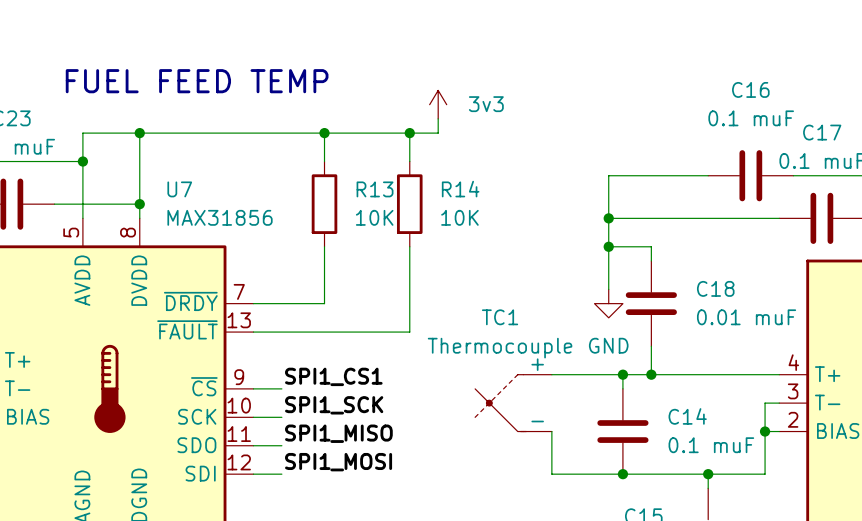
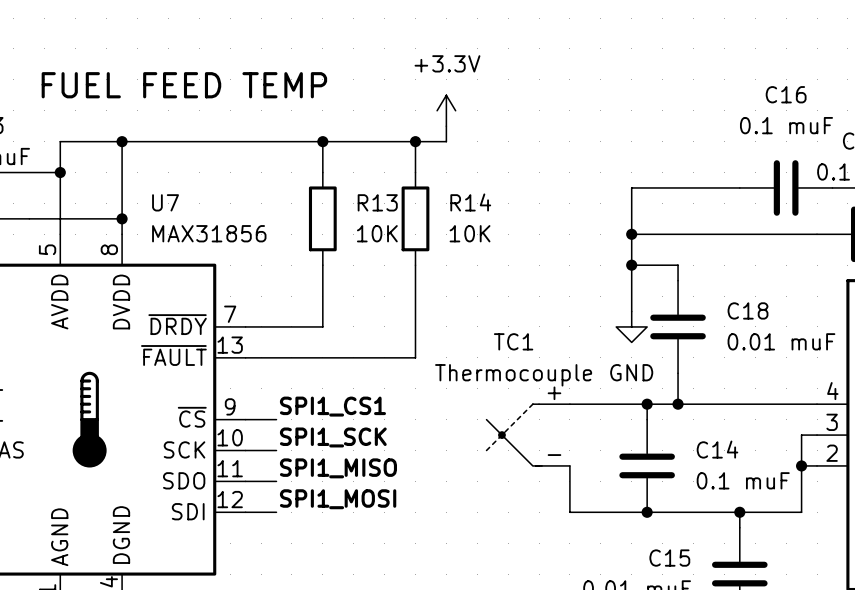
power symbol: 3v3 (438, 104) -> +3.3V (446, 110)

